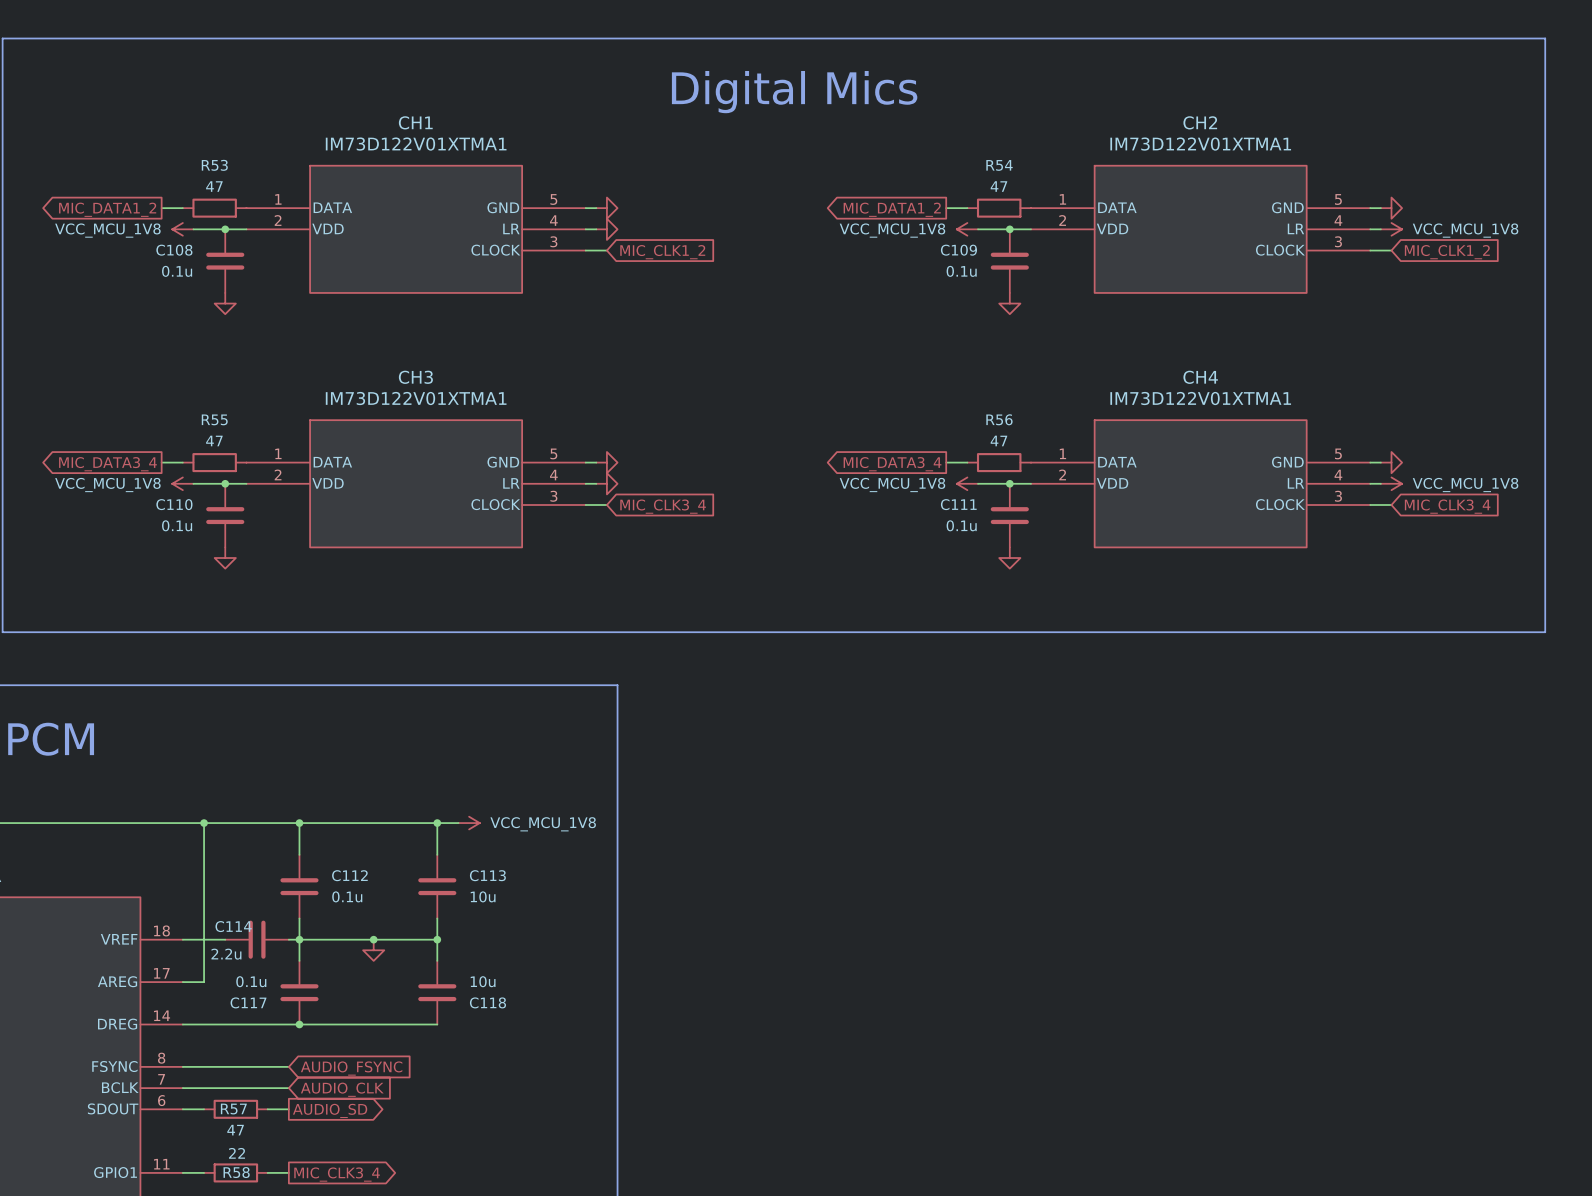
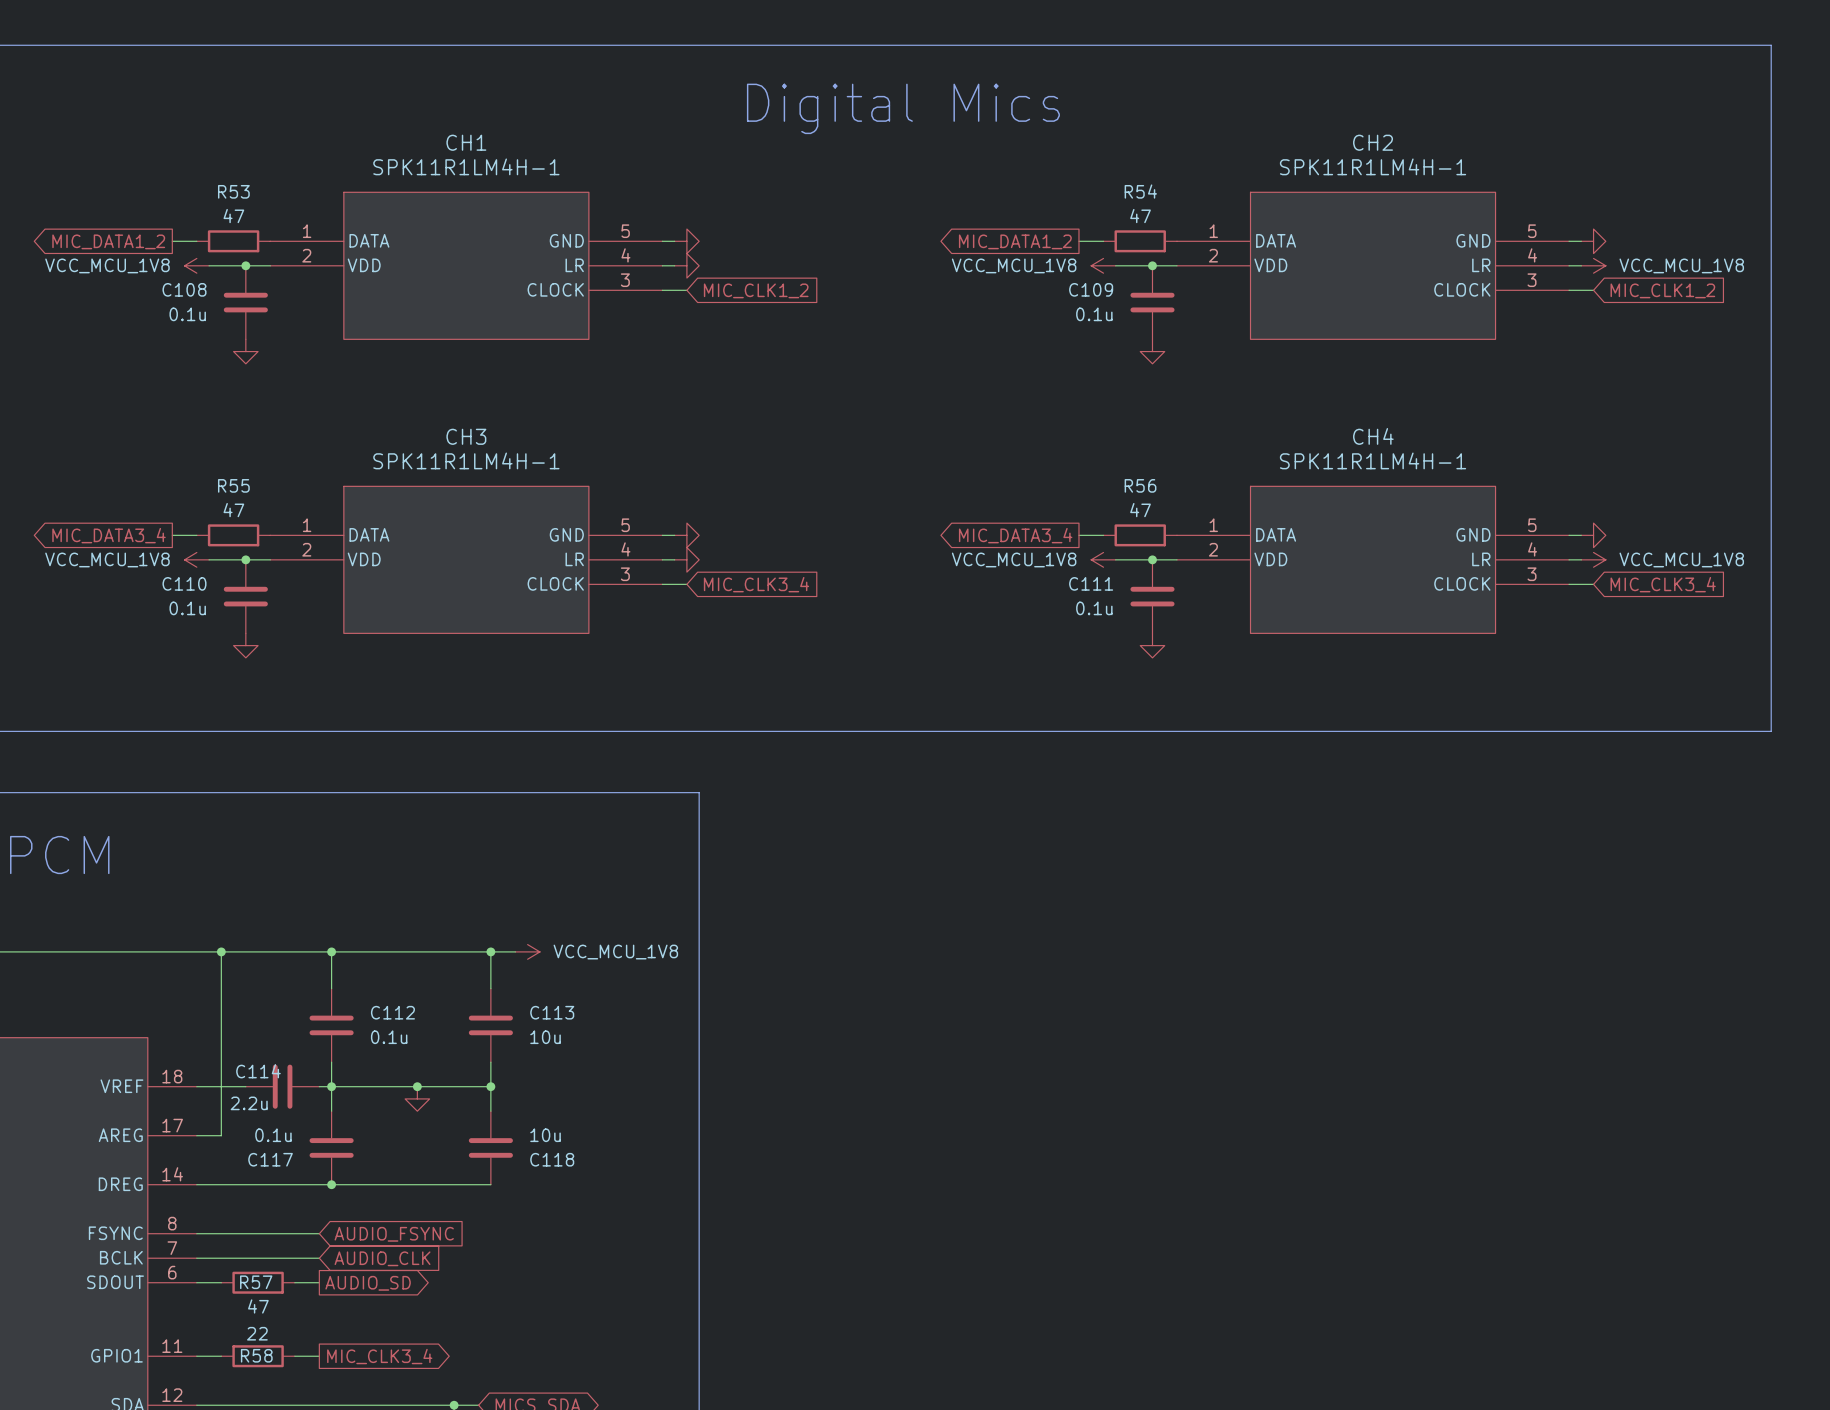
CH1 value: IM73D122V01XTMA1 (416, 144) -> SPK11R1LM4H-1 (466, 166)
CH2 value: IM73D122V01XTMA1 (1200, 144) -> SPK11R1LM4H-1 (1373, 166)
CH3 value: IM73D122V01XTMA1 (416, 398) -> SPK11R1LM4H-1 (466, 460)
CH4 value: IM73D122V01XTMA1 (1200, 398) -> SPK11R1LM4H-1 (1373, 460)

